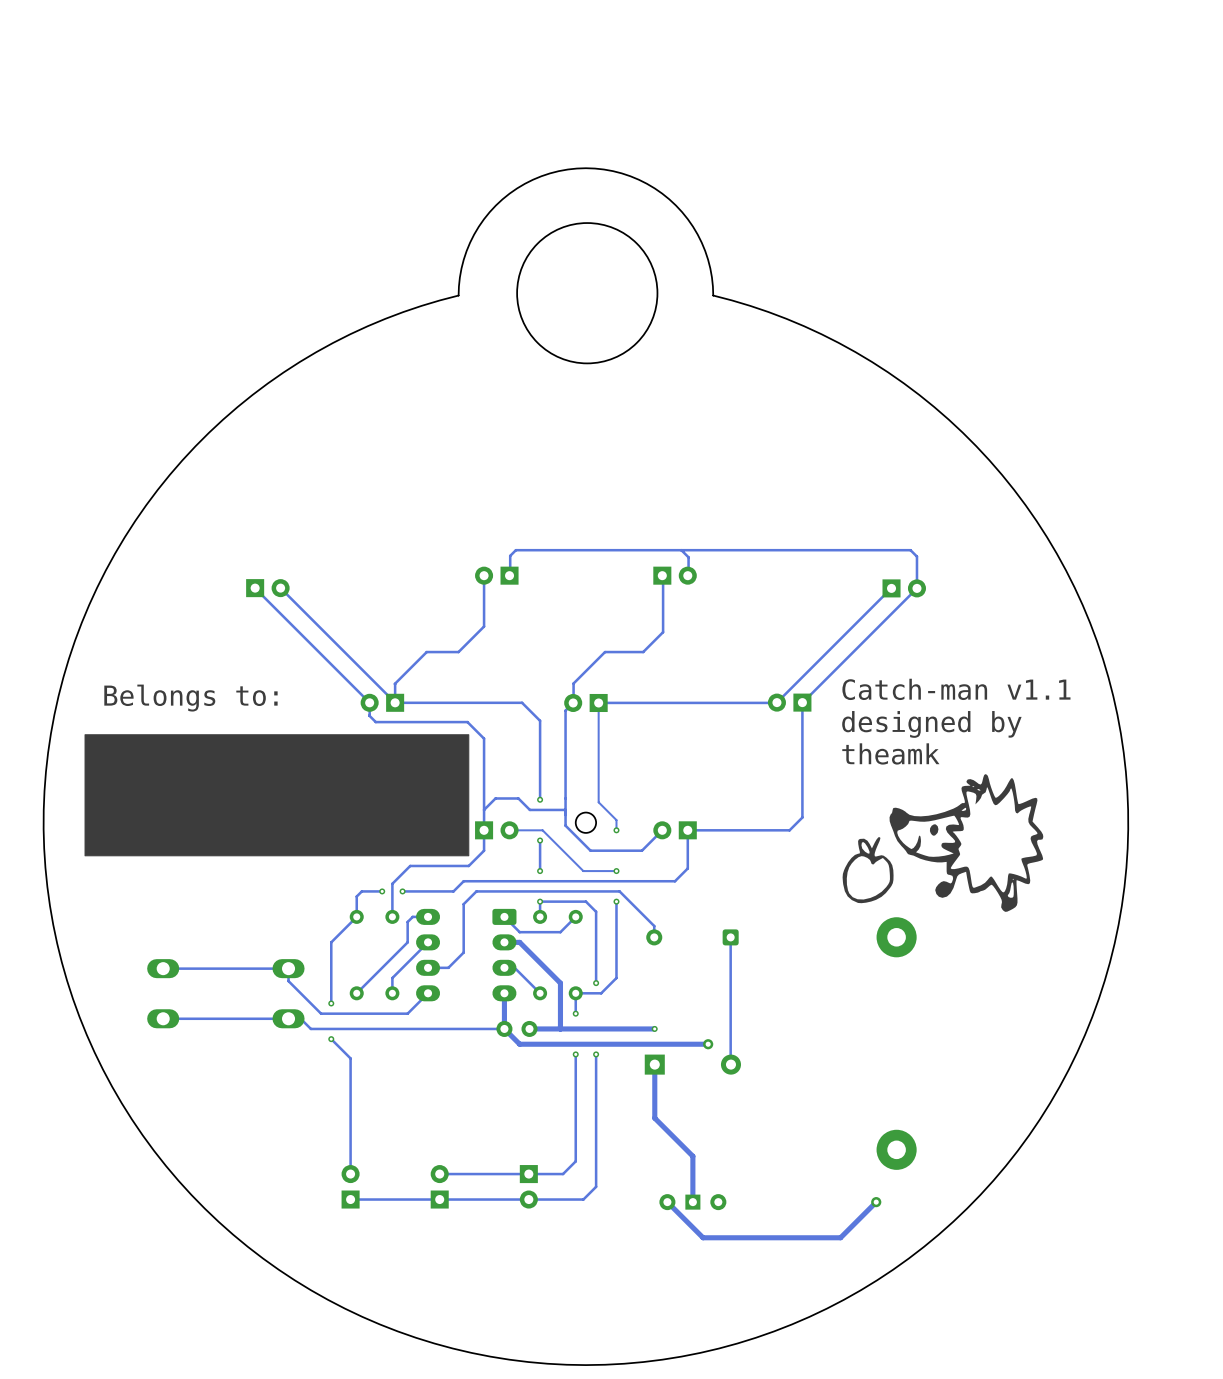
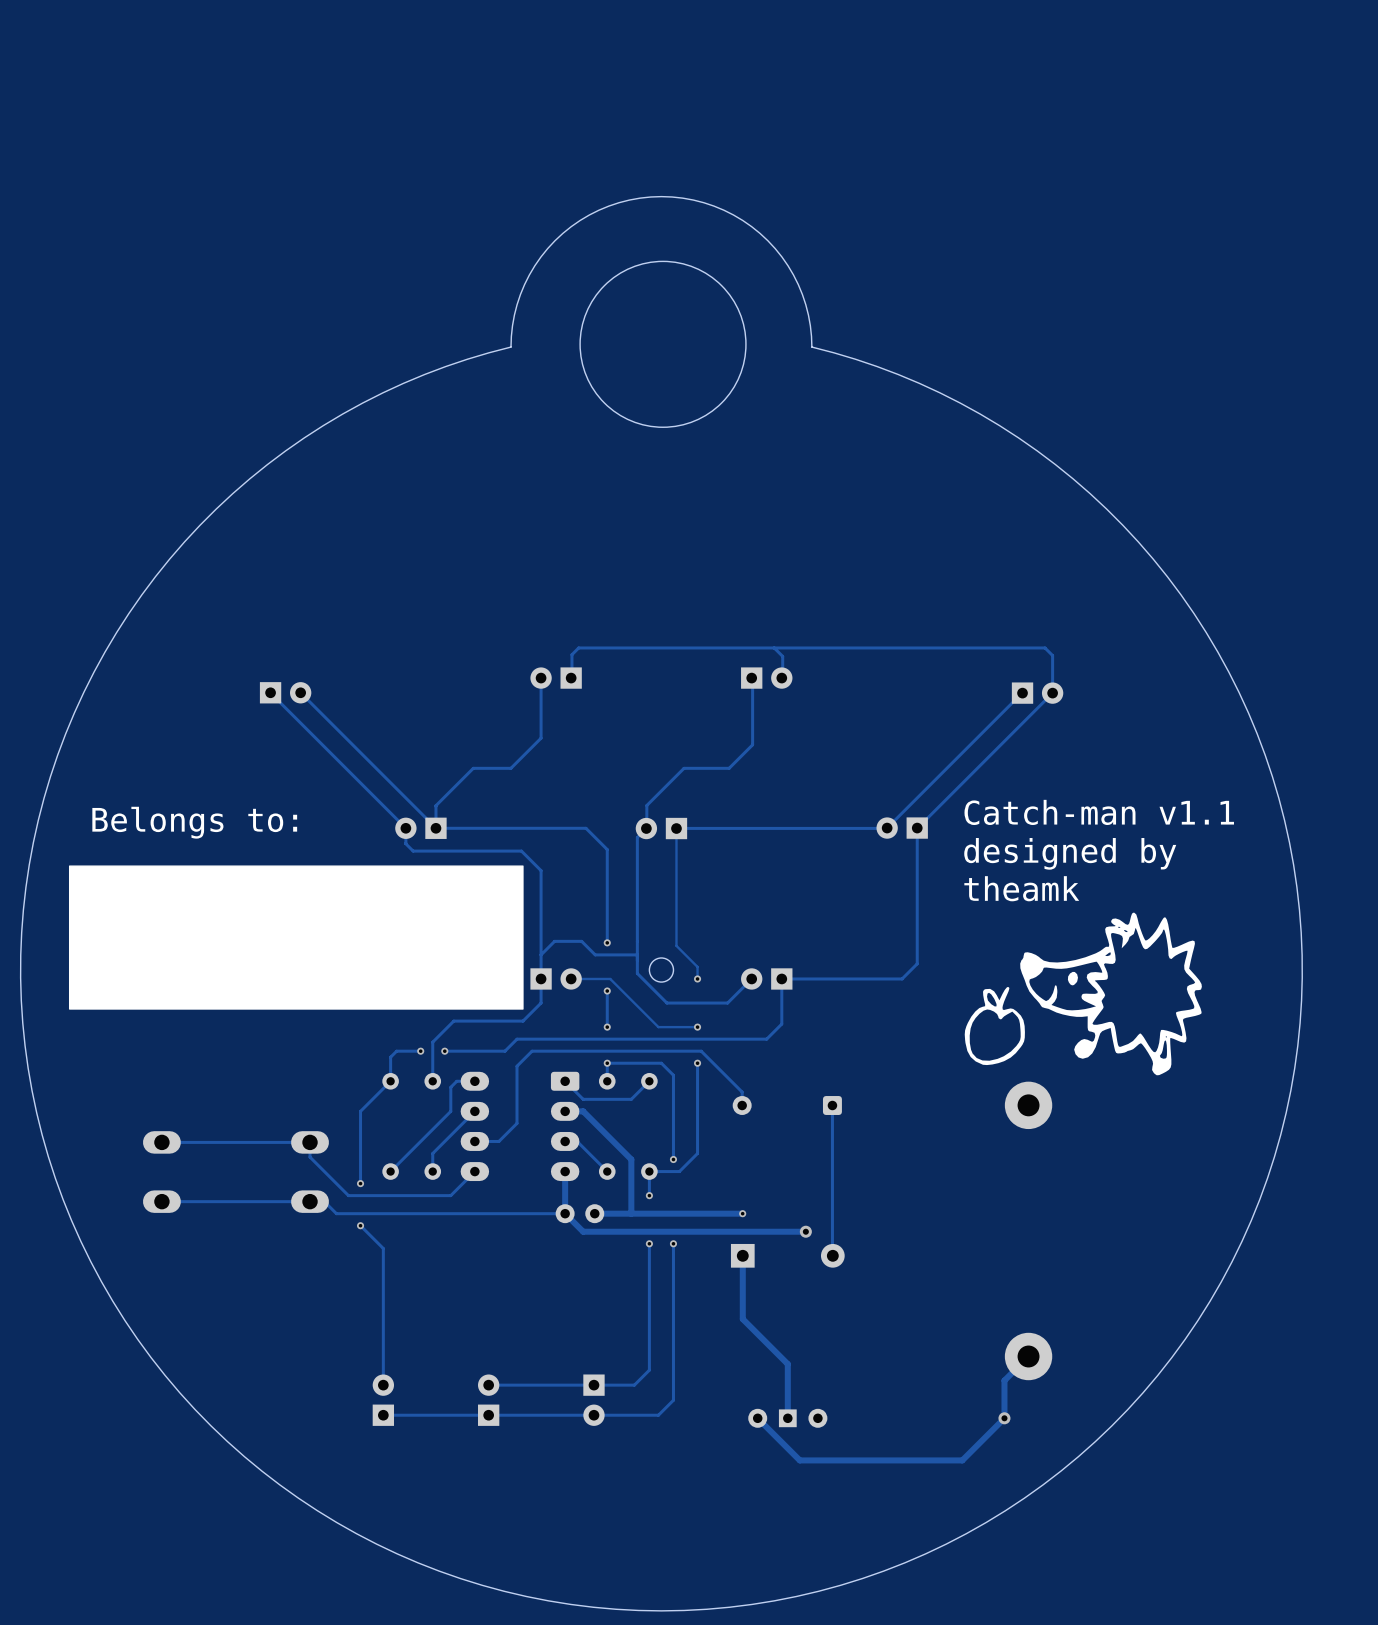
track: none -> (1028, 1356) (1004, 1380) (1004, 1418)

